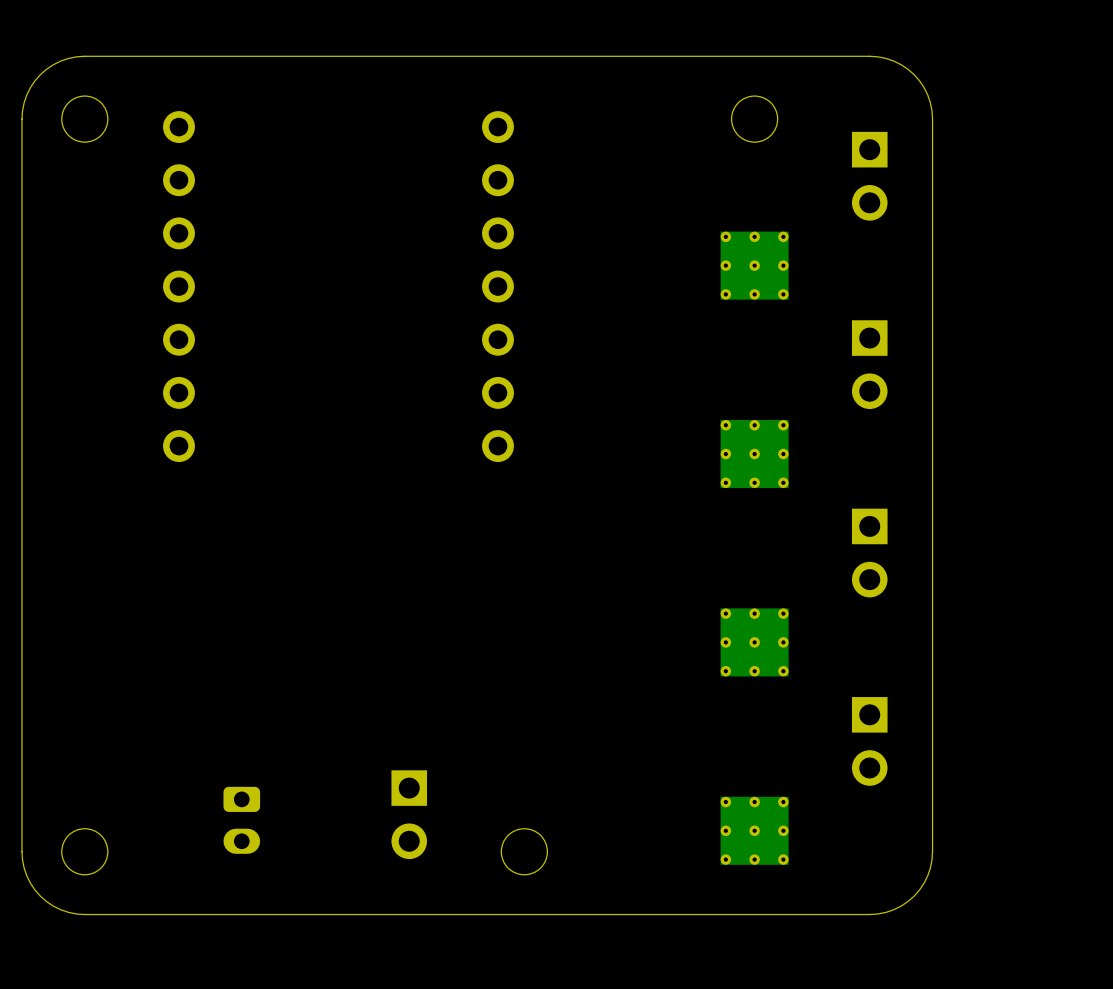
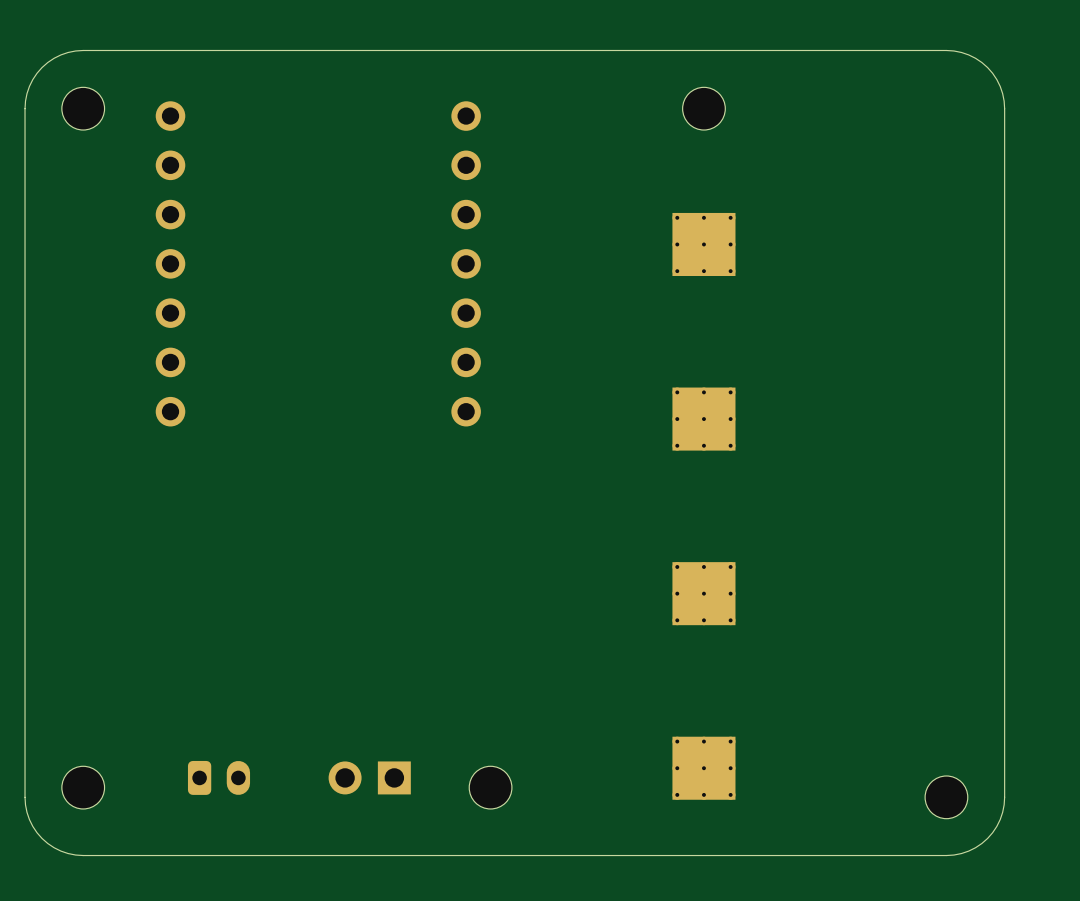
board edge: (869, 56) (893, 61) (914, 74) (927, 95) (932, 119) (932, 851) (927, 875) (914, 896) (893, 909) (869, 914) (84, 914) (60, 909) (40, 896) (26, 875) (21, 851) -> (810, 50) (946, 50) (961, 52) (975, 58) (987, 67) (996, 79) (1002, 93) (1004, 108) (1004, 797) (1000, 819) (987, 838) (968, 851) (946, 855) (83, 855) (60, 851) (47, 843) (37, 832) (27, 812) (25, 787)
part: (869, 176) -> none
part: (869, 364) -> none
part: (869, 553) -> none
part: (869, 741) -> none
part rotation: 0° (409, 814) -> 90° clockwise (369, 777)
part rotation: 0° (241, 820) -> 90° counterclockwise (219, 777)
part: none -> (946, 797)

